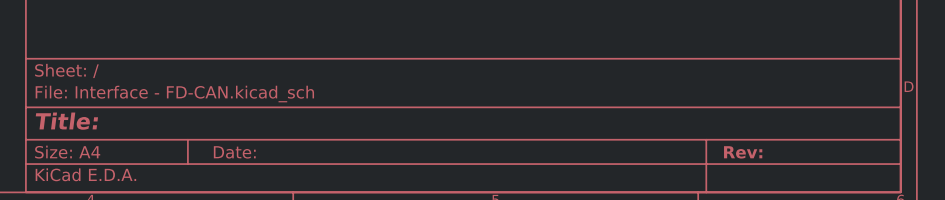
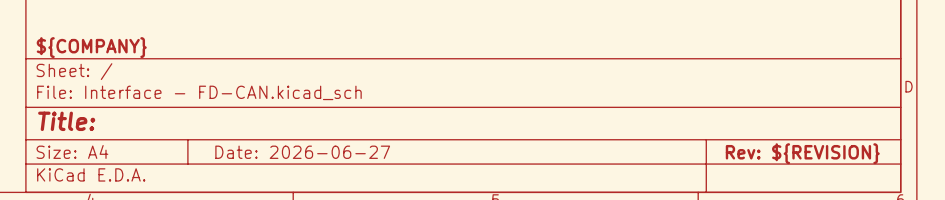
title block: none -> ${COMPANY} (91, 47)
title block: Date: (234, 152) -> Date: 2026-06-27 (302, 152)
title block: Rev: (743, 152) -> Rev: ${REVISION} (802, 153)

